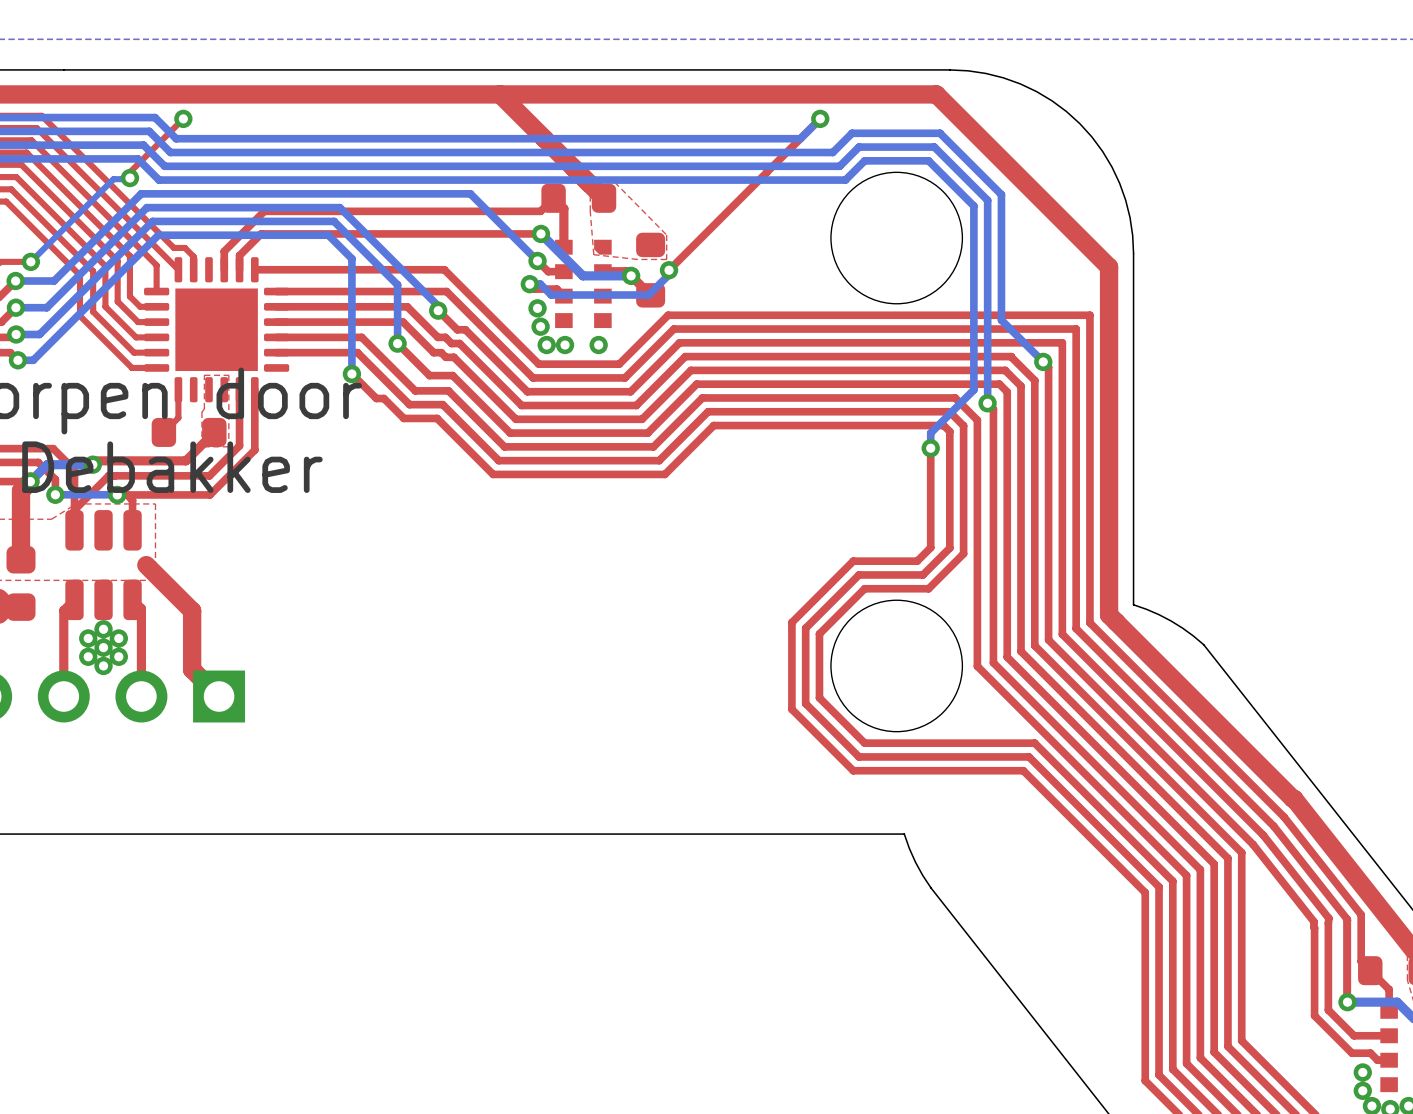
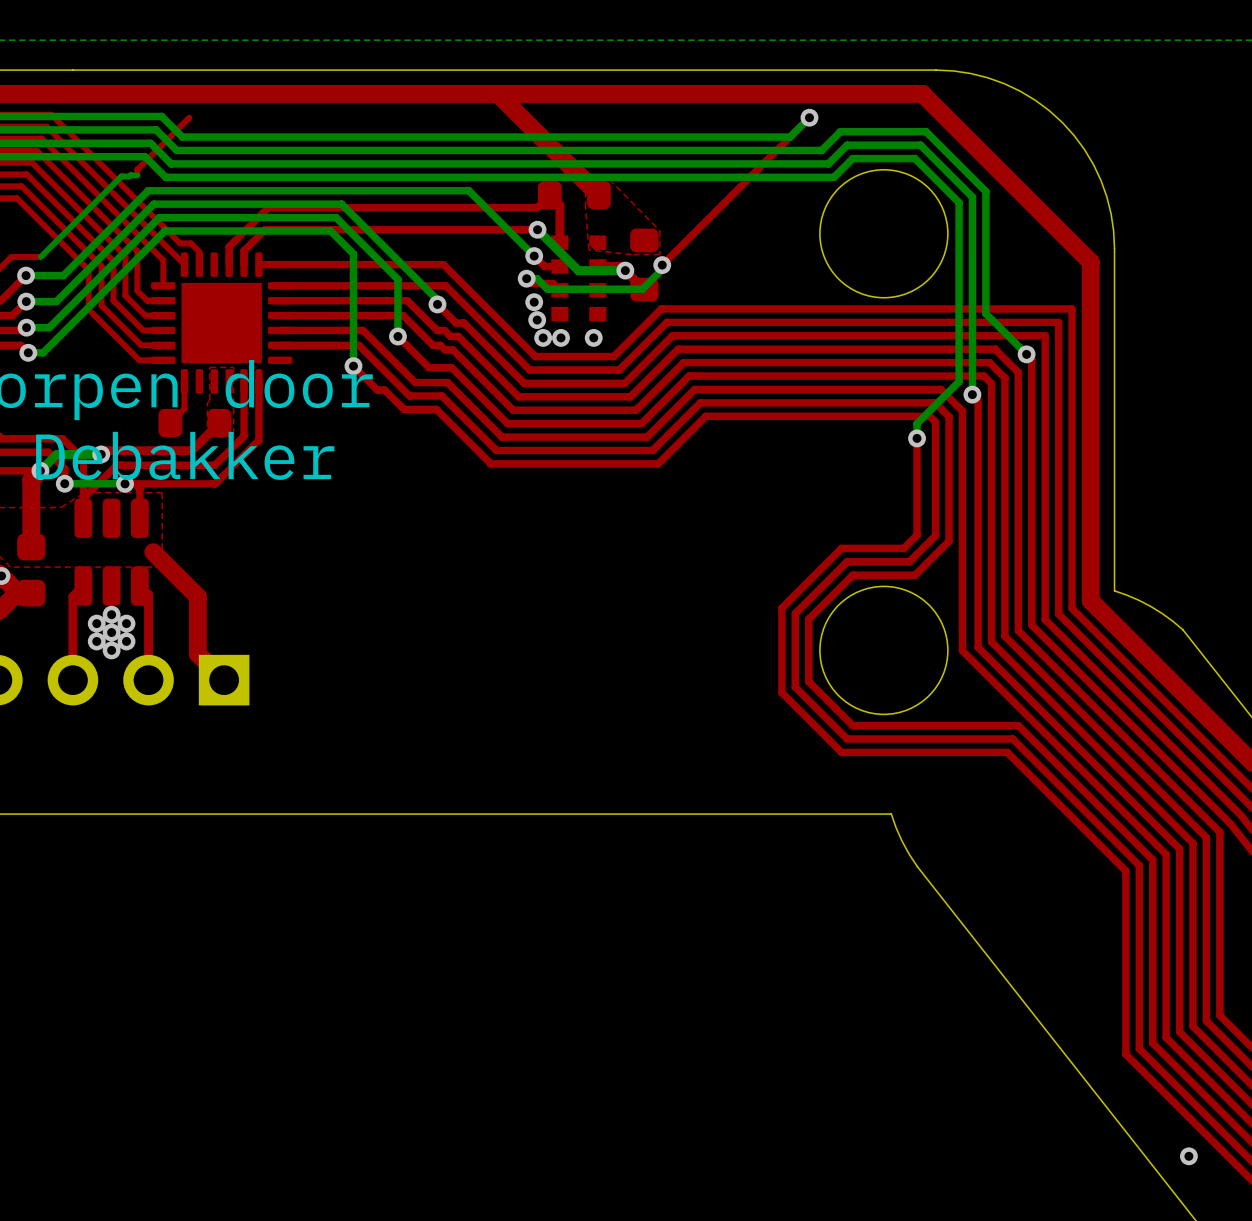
via: (183, 118) -> none
via: (129, 178) -> none
via: (30, 261) -> none

